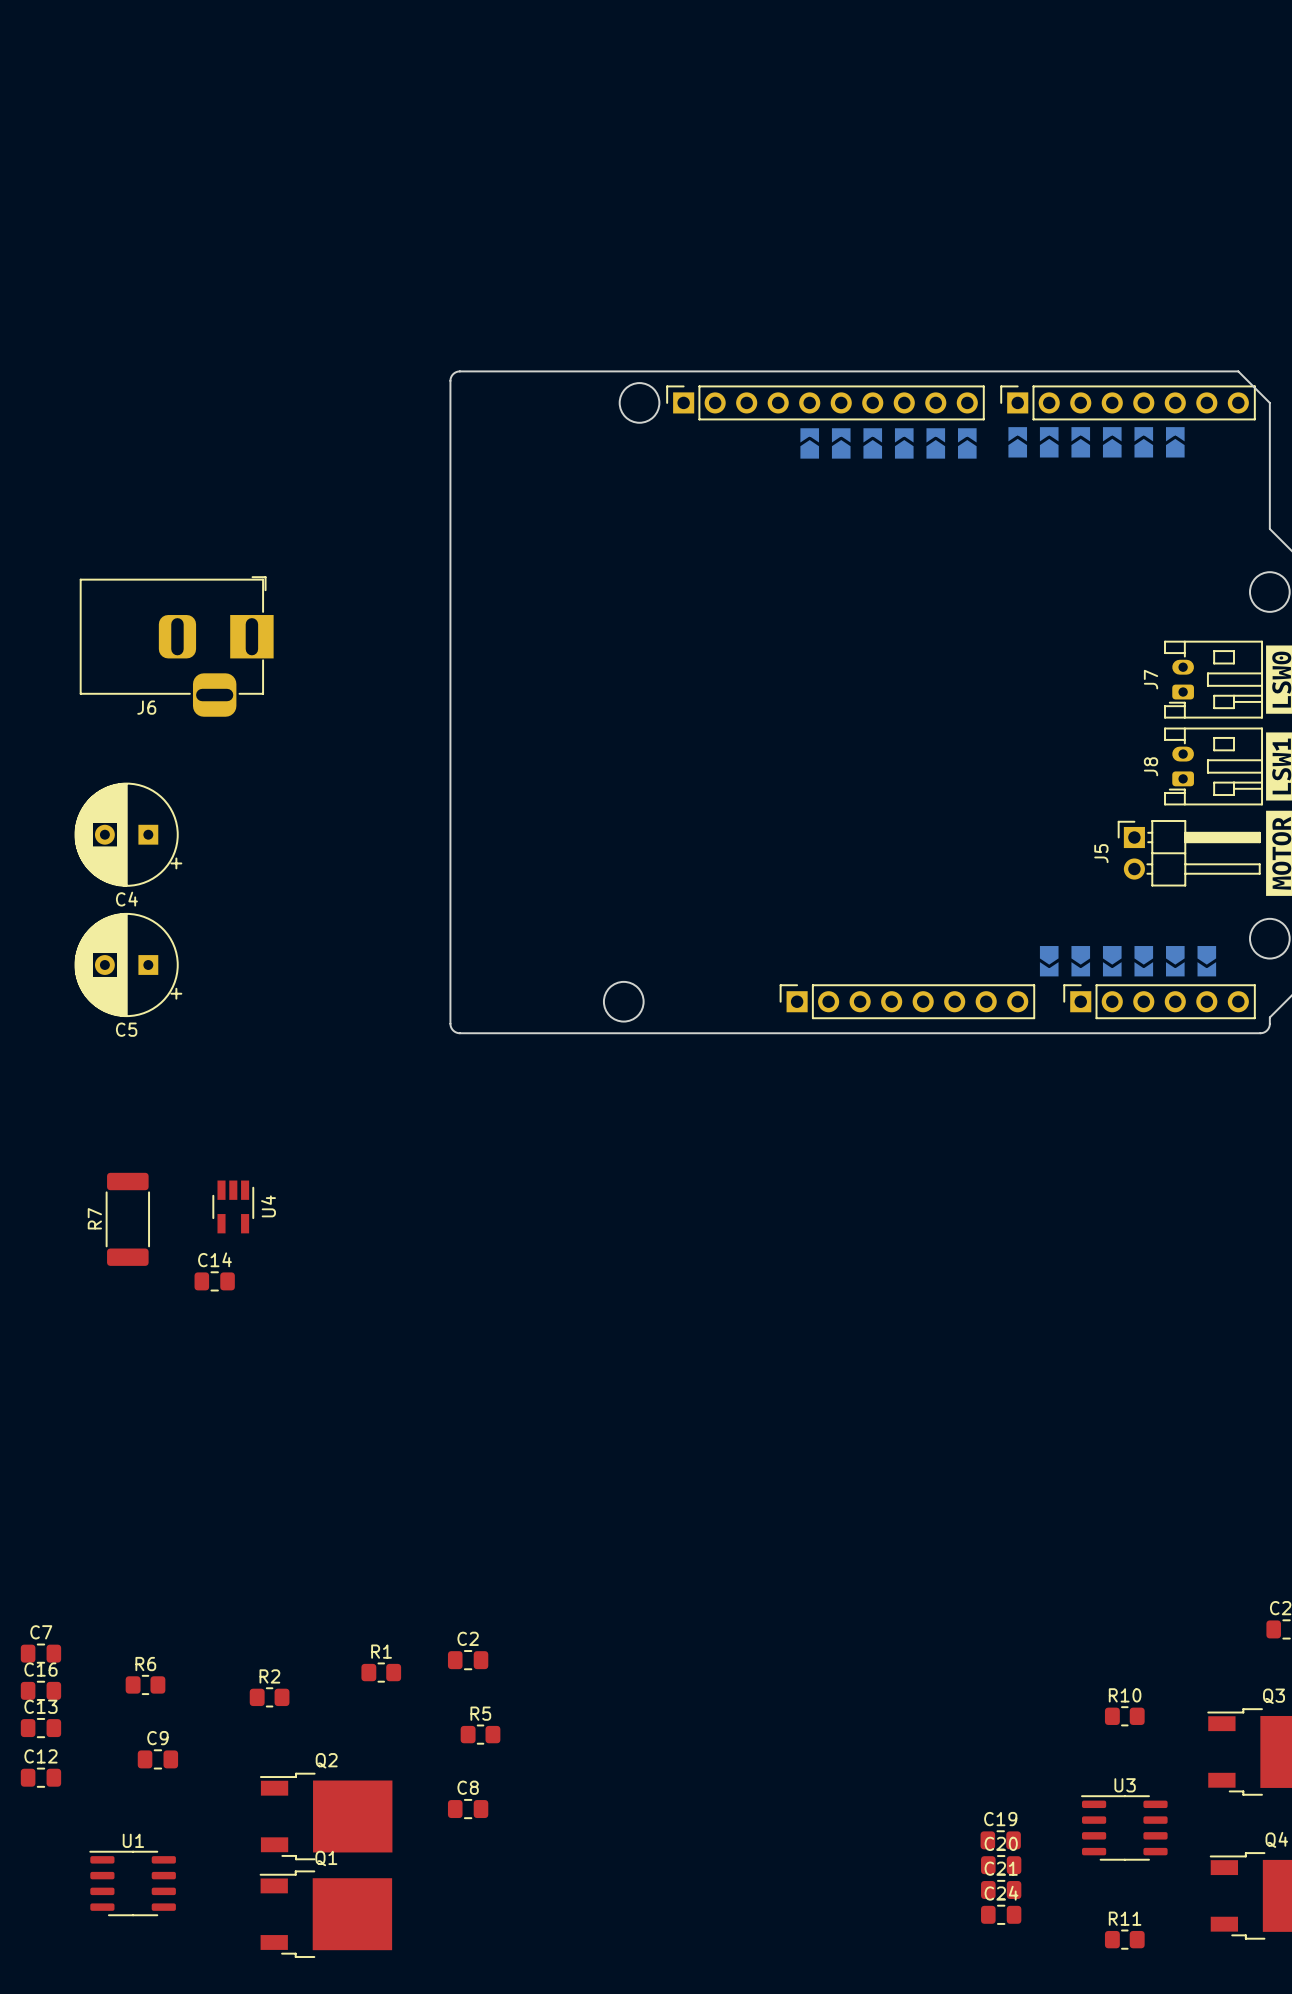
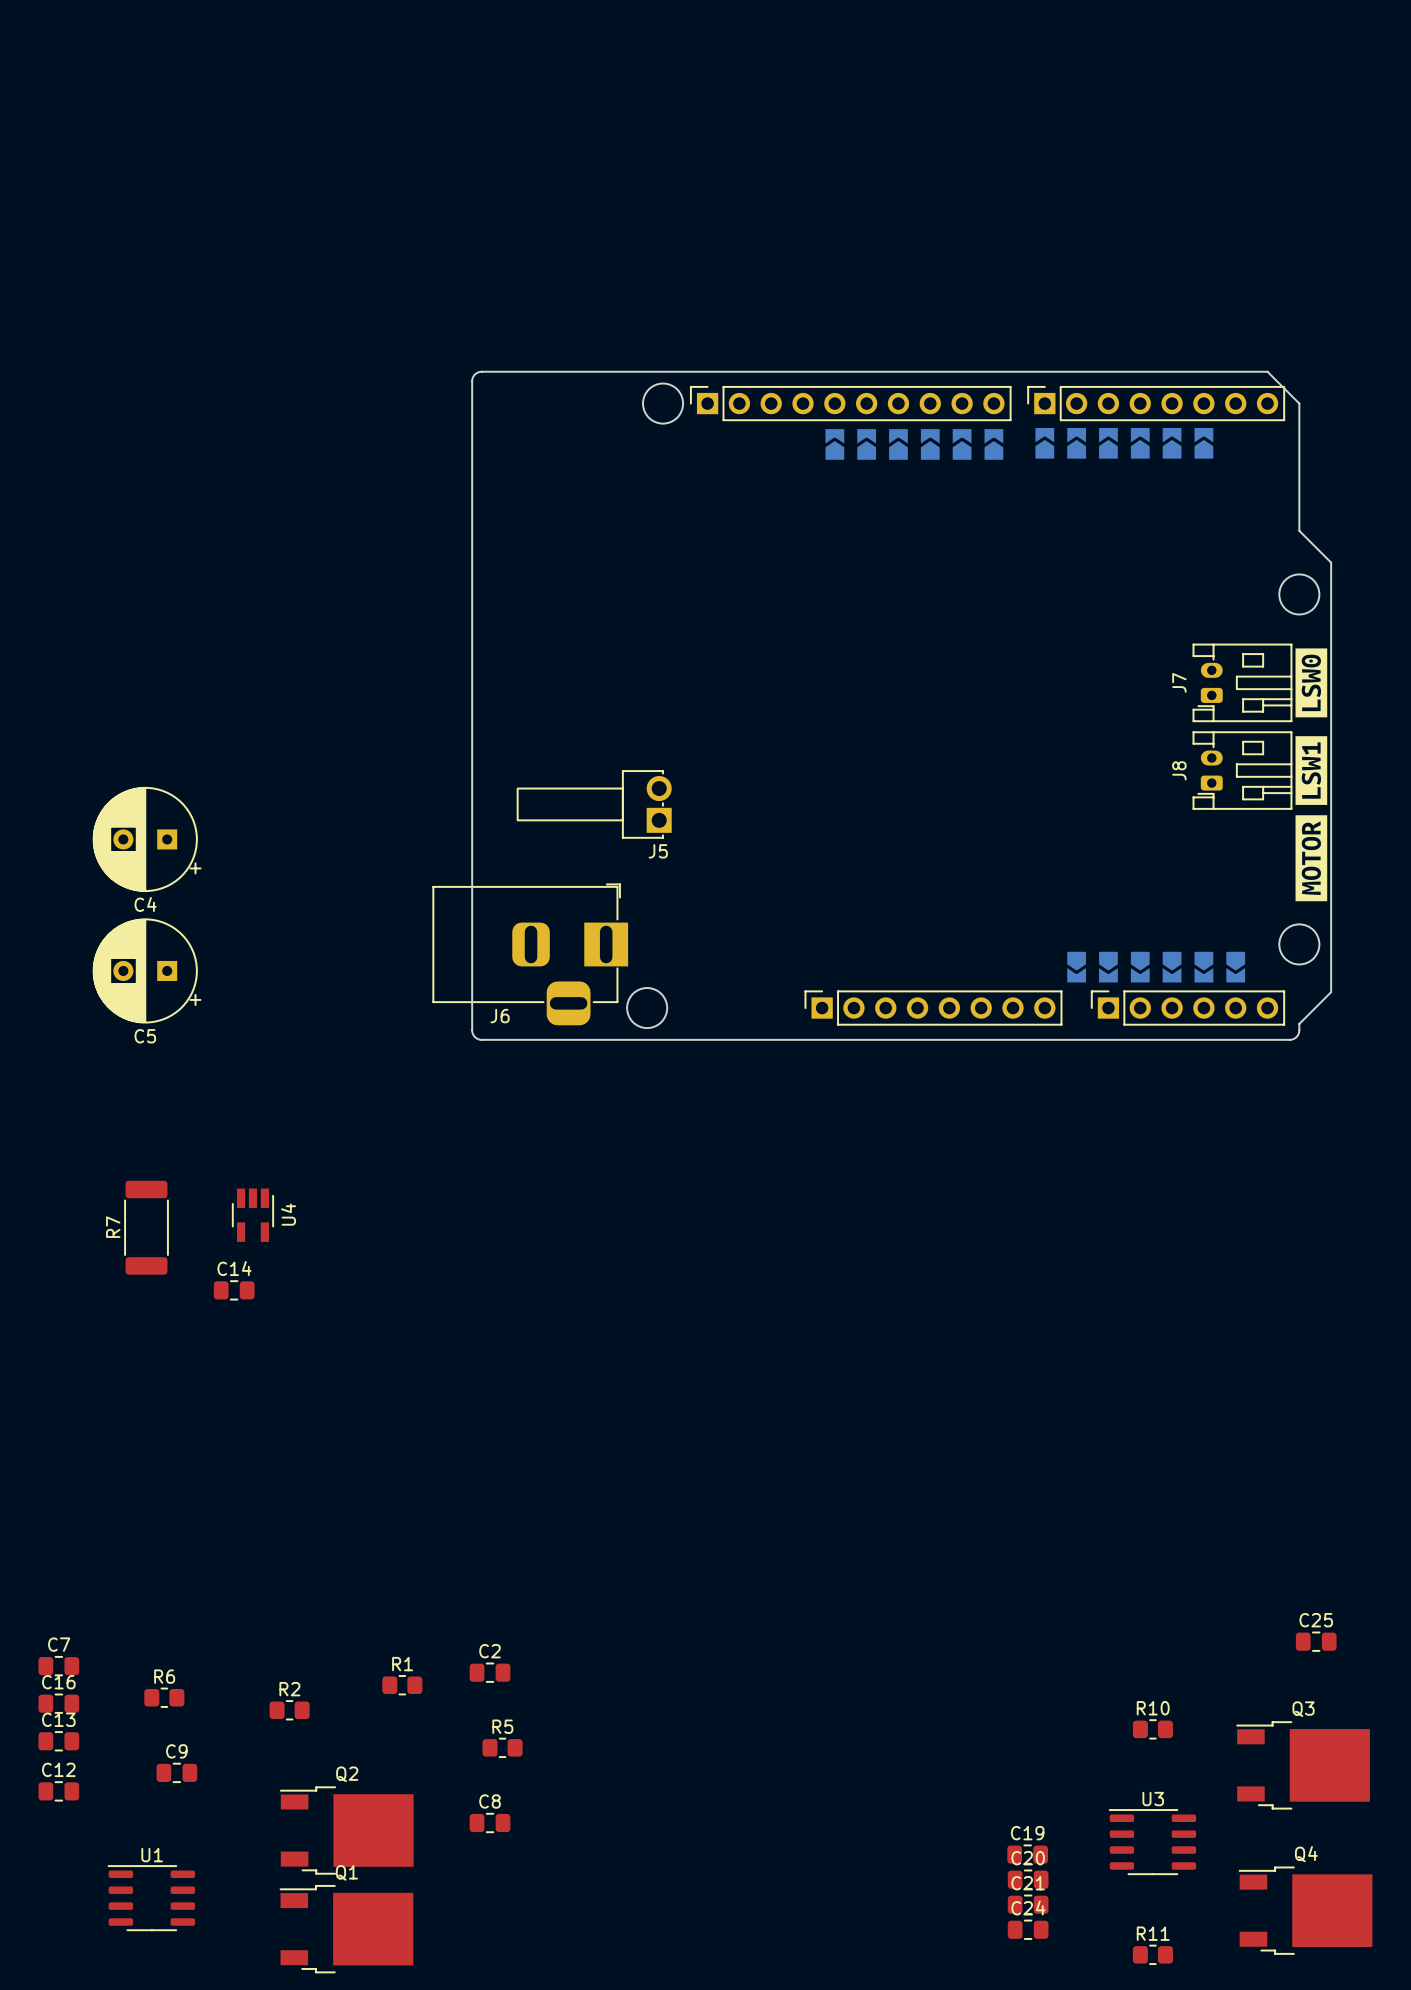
J6 position: (176, 646) -> (530, 954)
J5 footprint: [1117, 820, 1261, 887] -> [516, 770, 672, 839]
J5 name position: J5 (1101, 853) -> J5 (658, 851)

